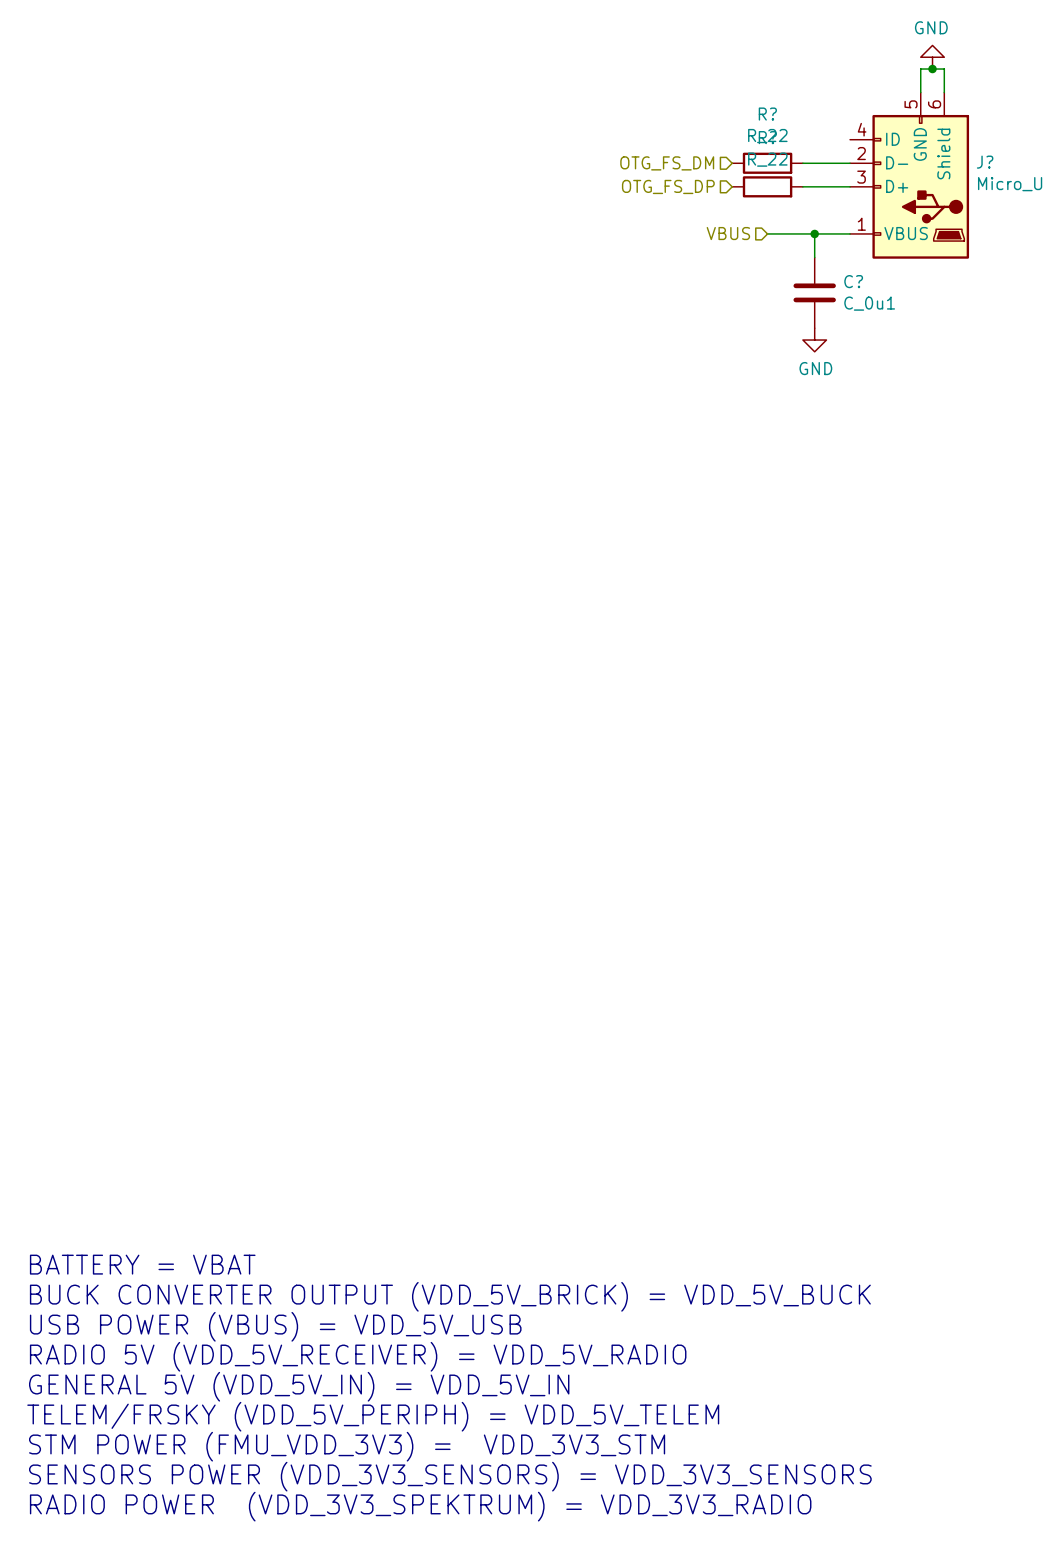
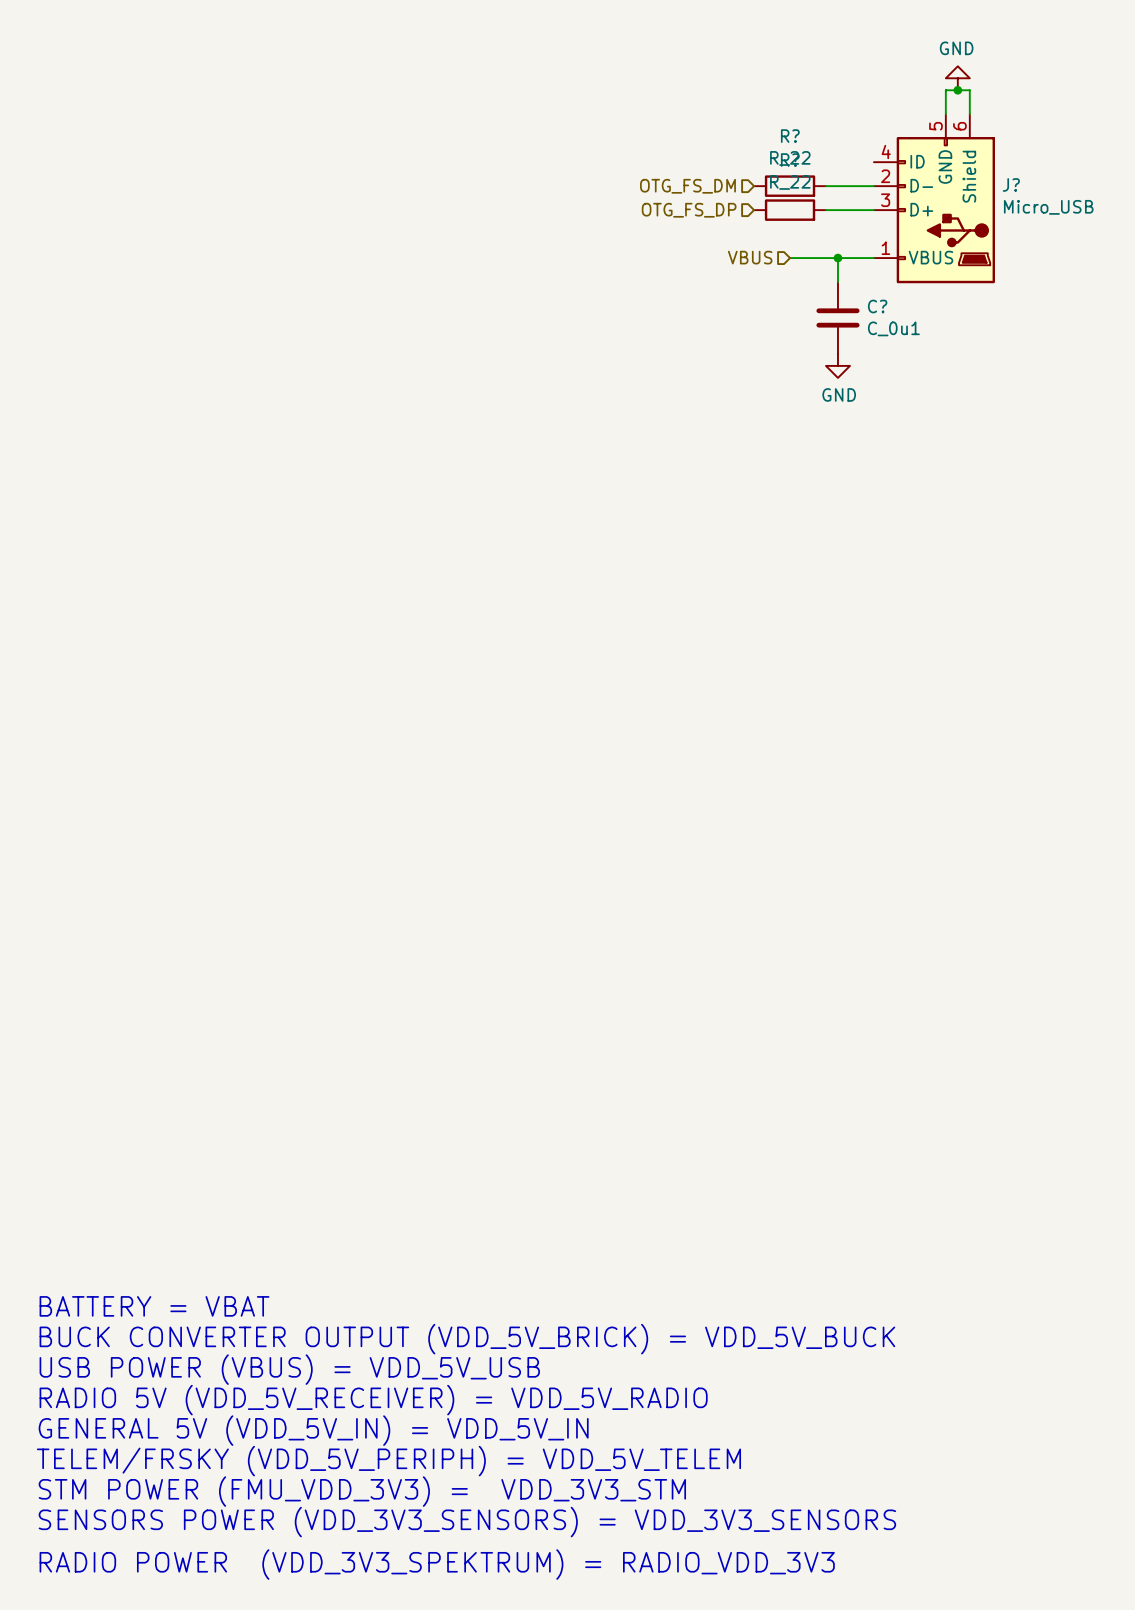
text: RADIO POWER (VDD_3V3_SPEKTRUM) = VDD_3V3_RADIO (420, 1506) -> RADIO POWER (VDD_3V3_SPEKTRUM) = RADIO_VDD_3V3 (437, 1564)

